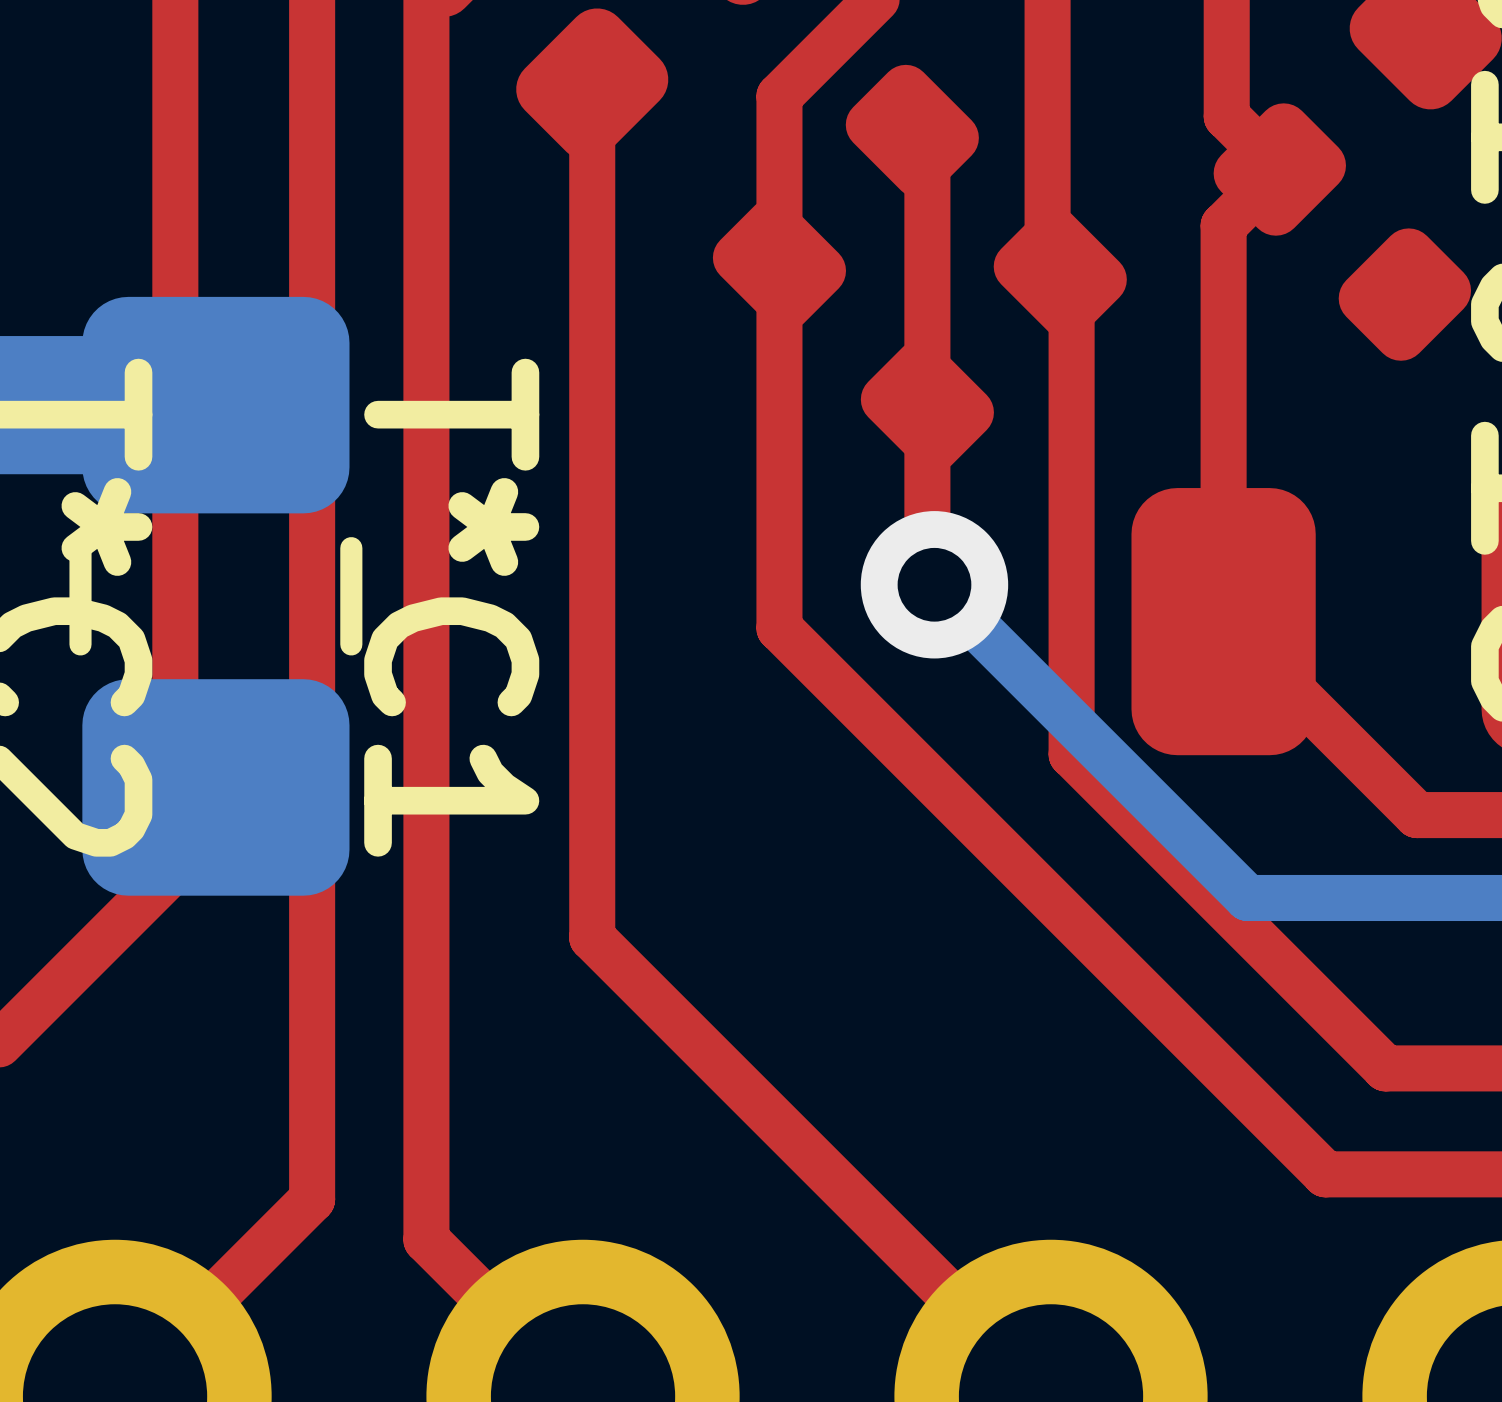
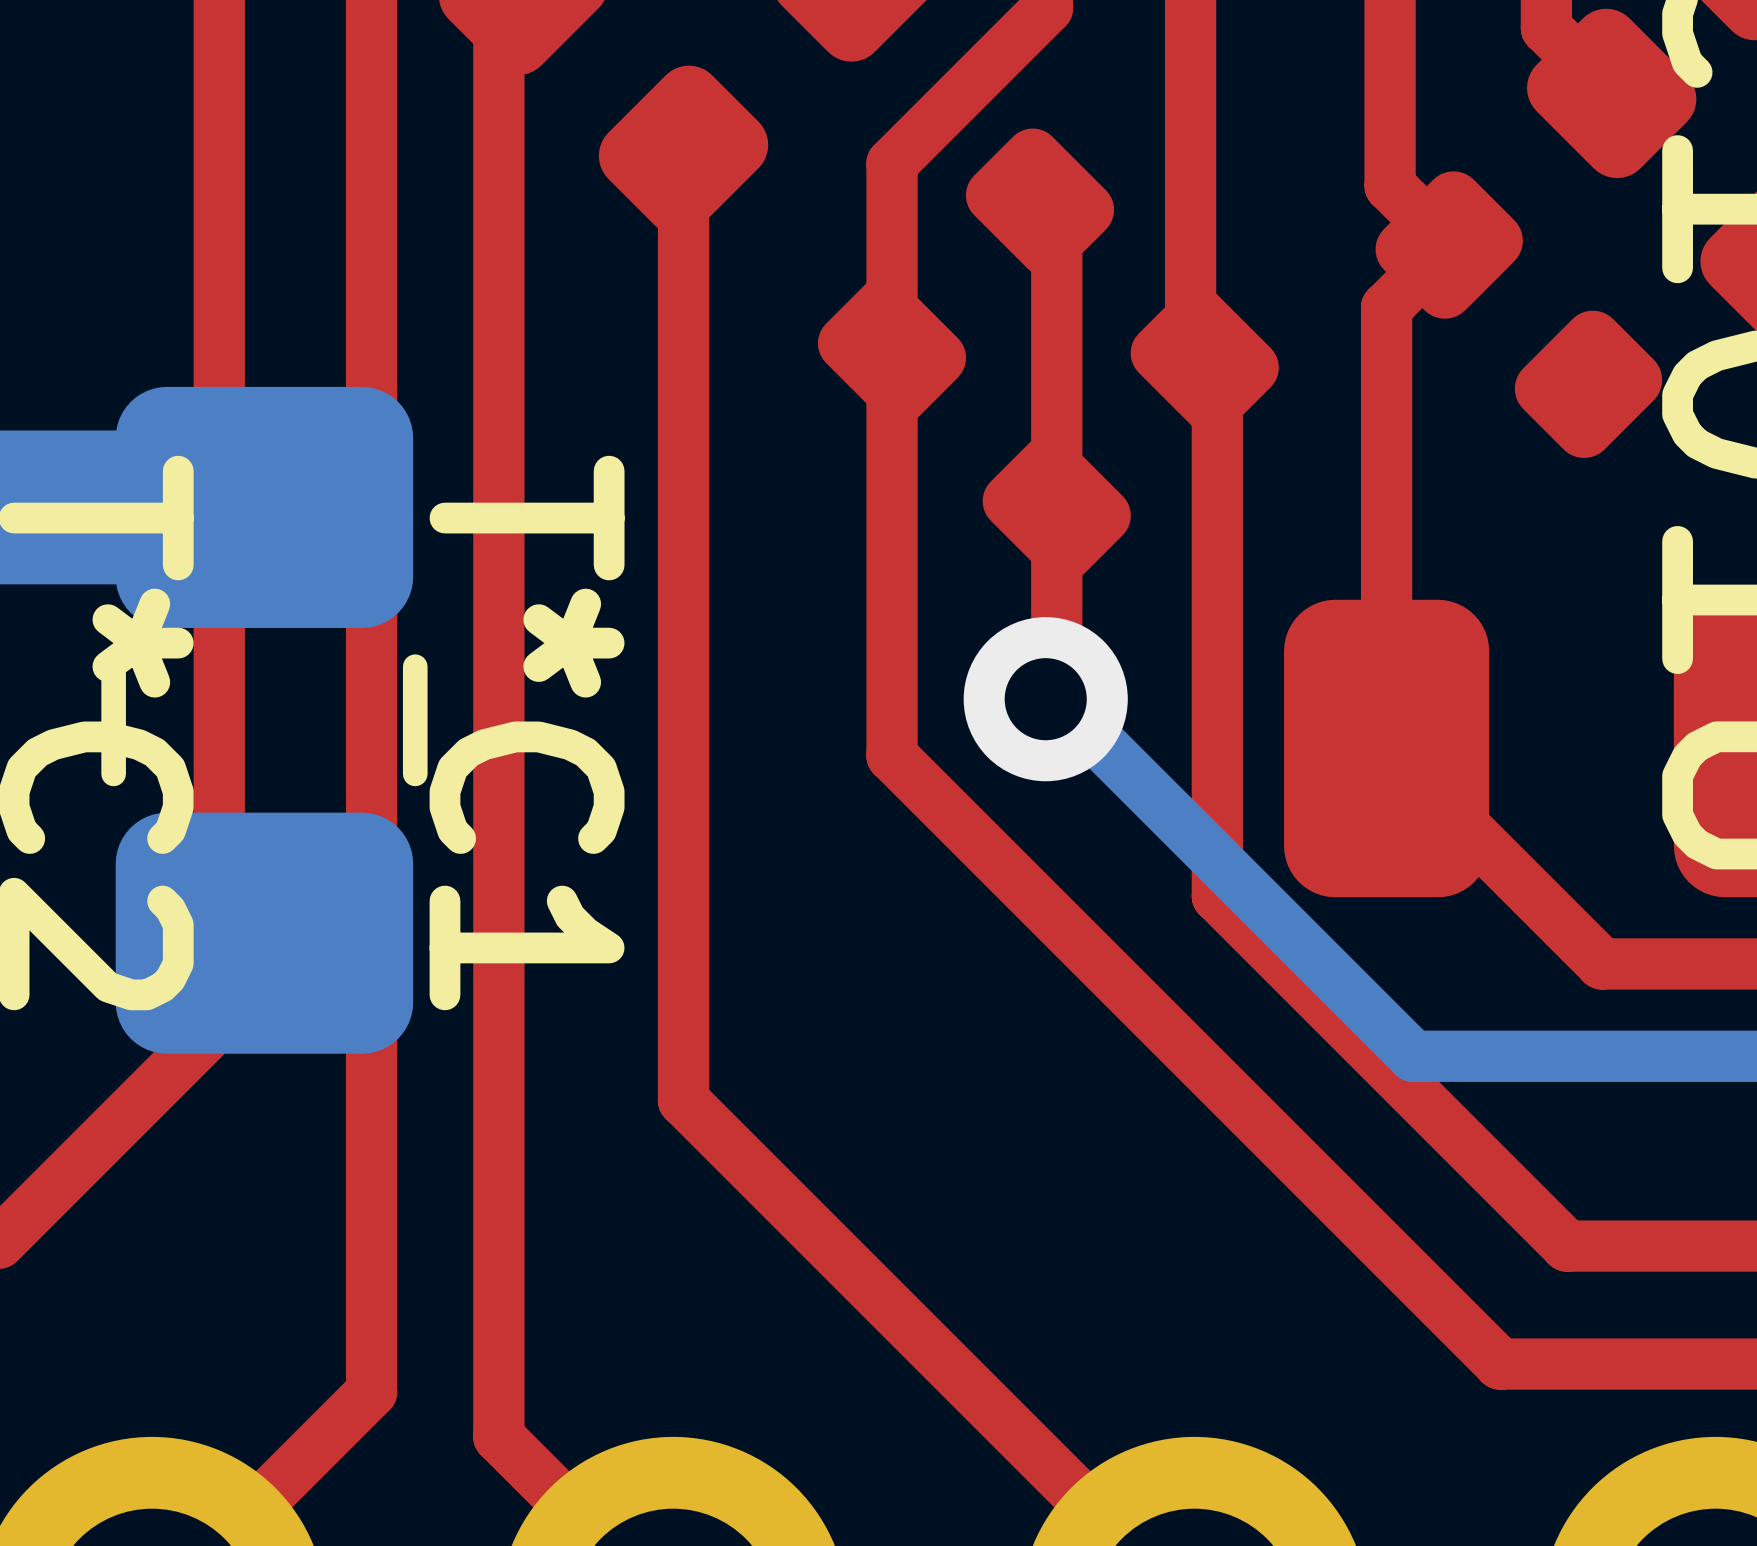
via position: (934, 584) -> (1045, 699)

